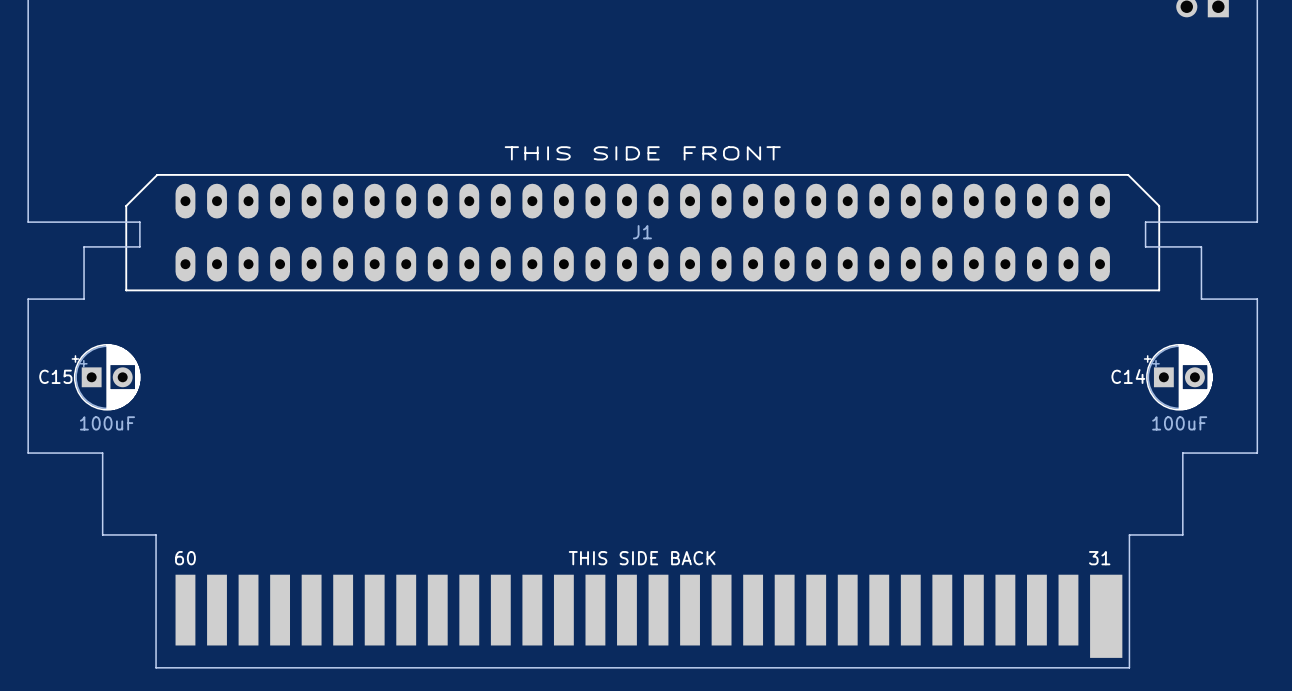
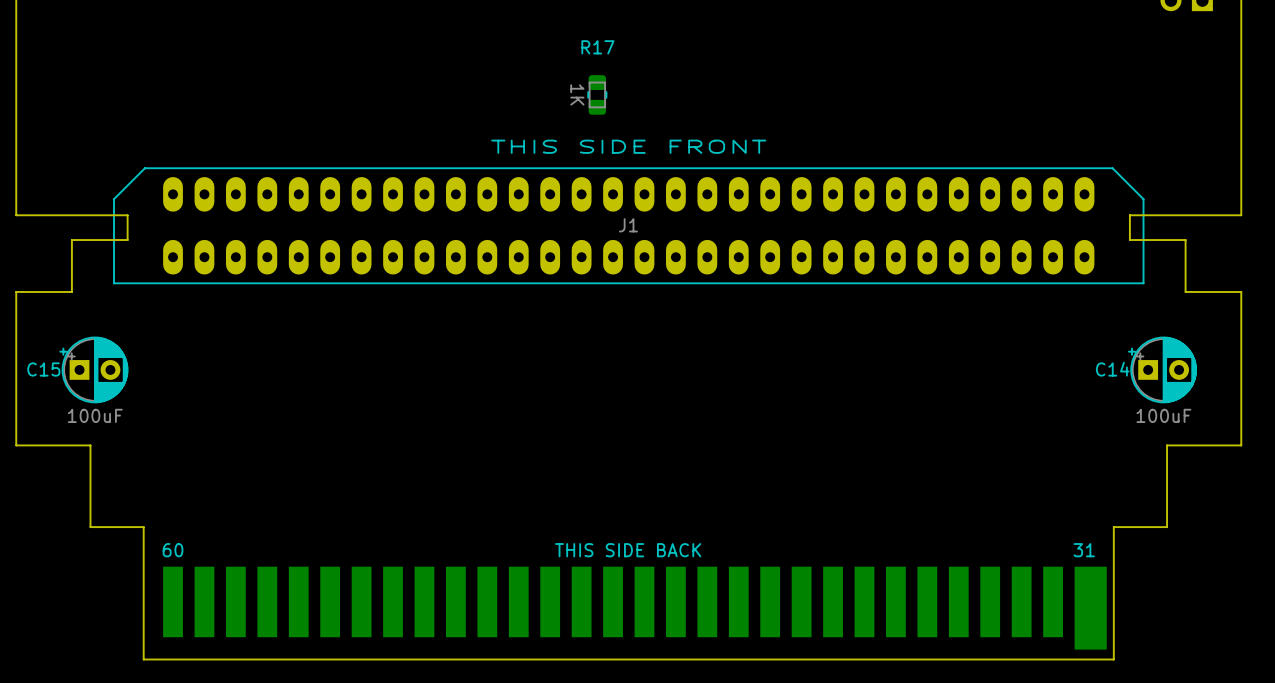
R17: none -> 1K (597, 94)

